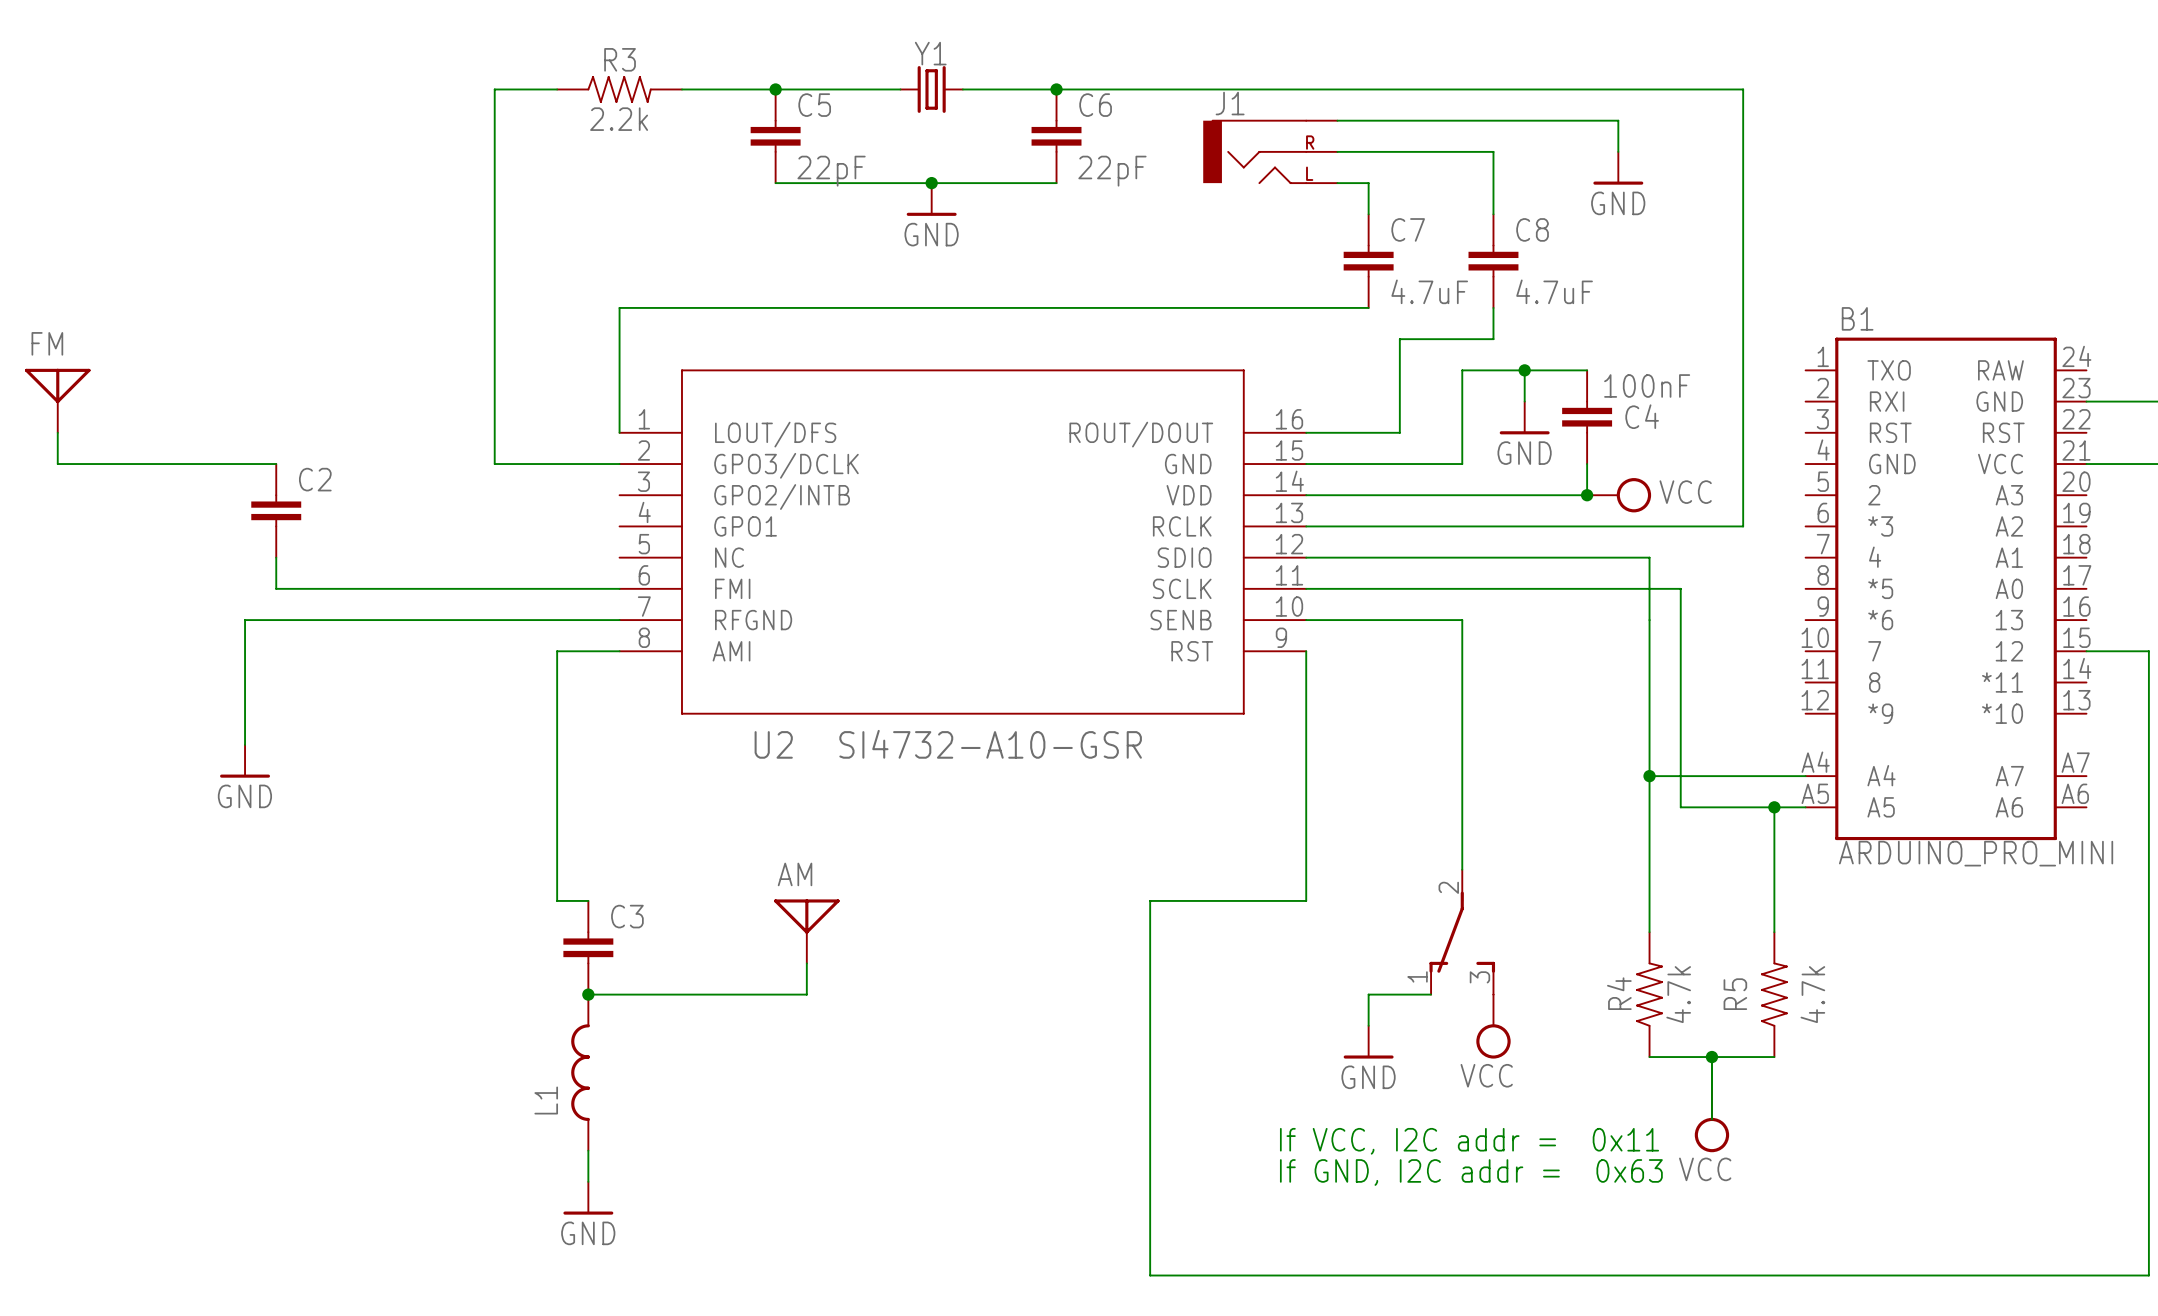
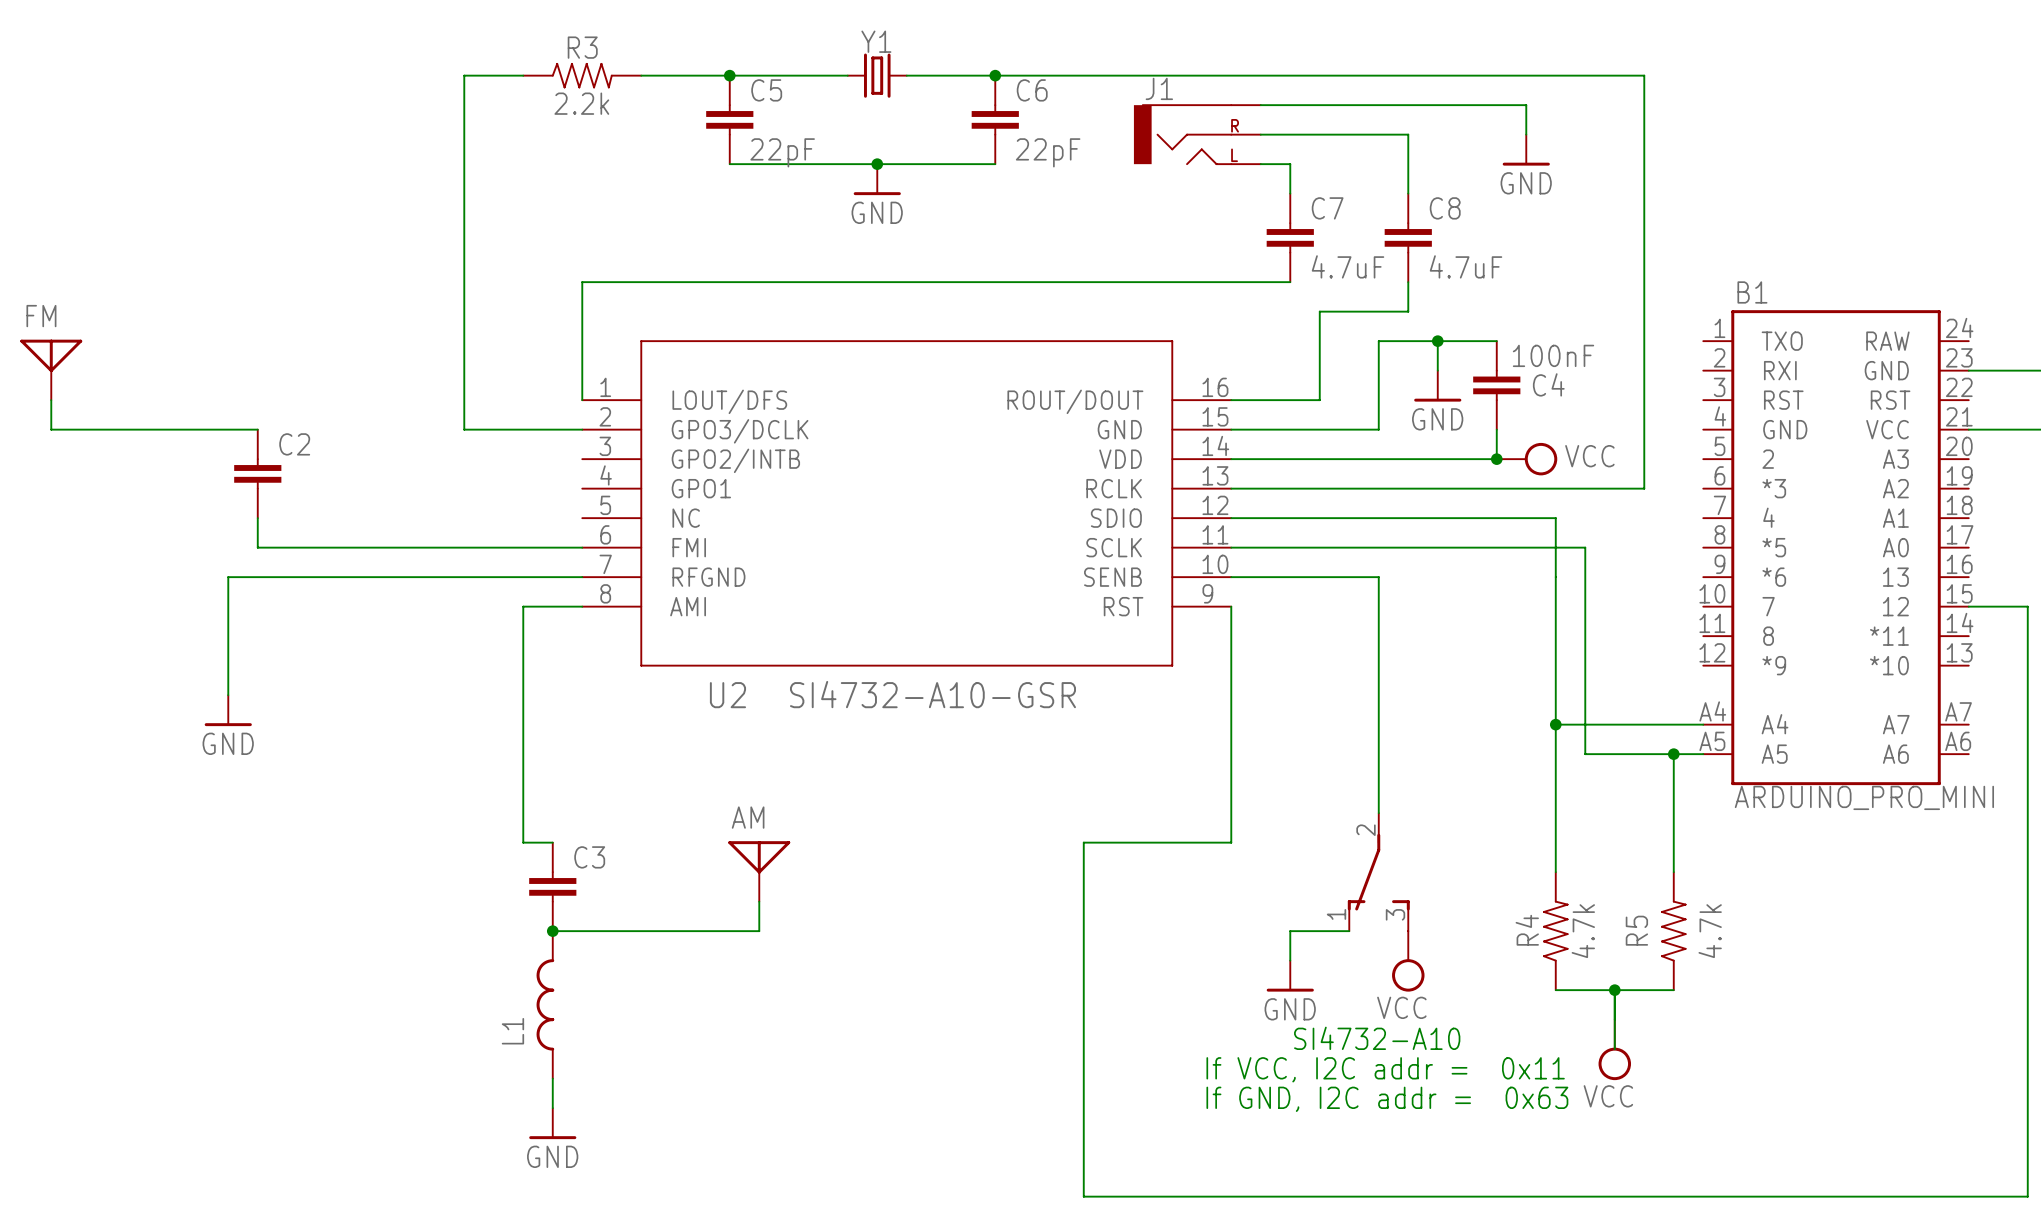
text: none -> SI4732-A10 (1377, 1038)

